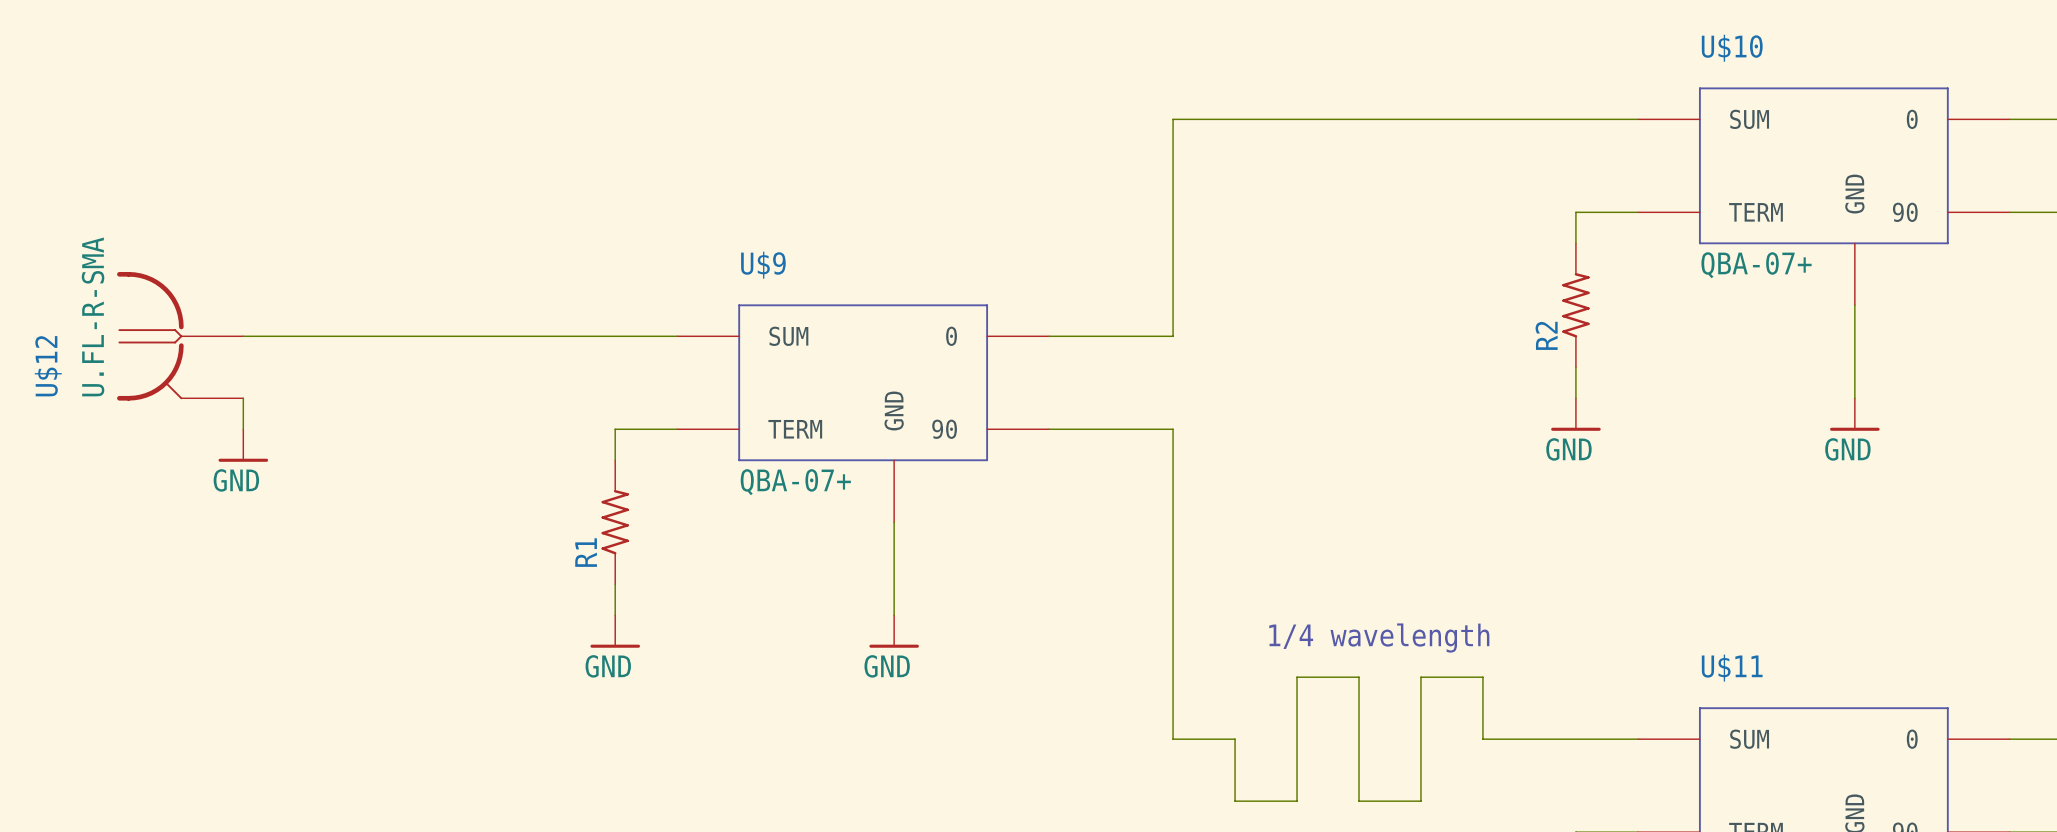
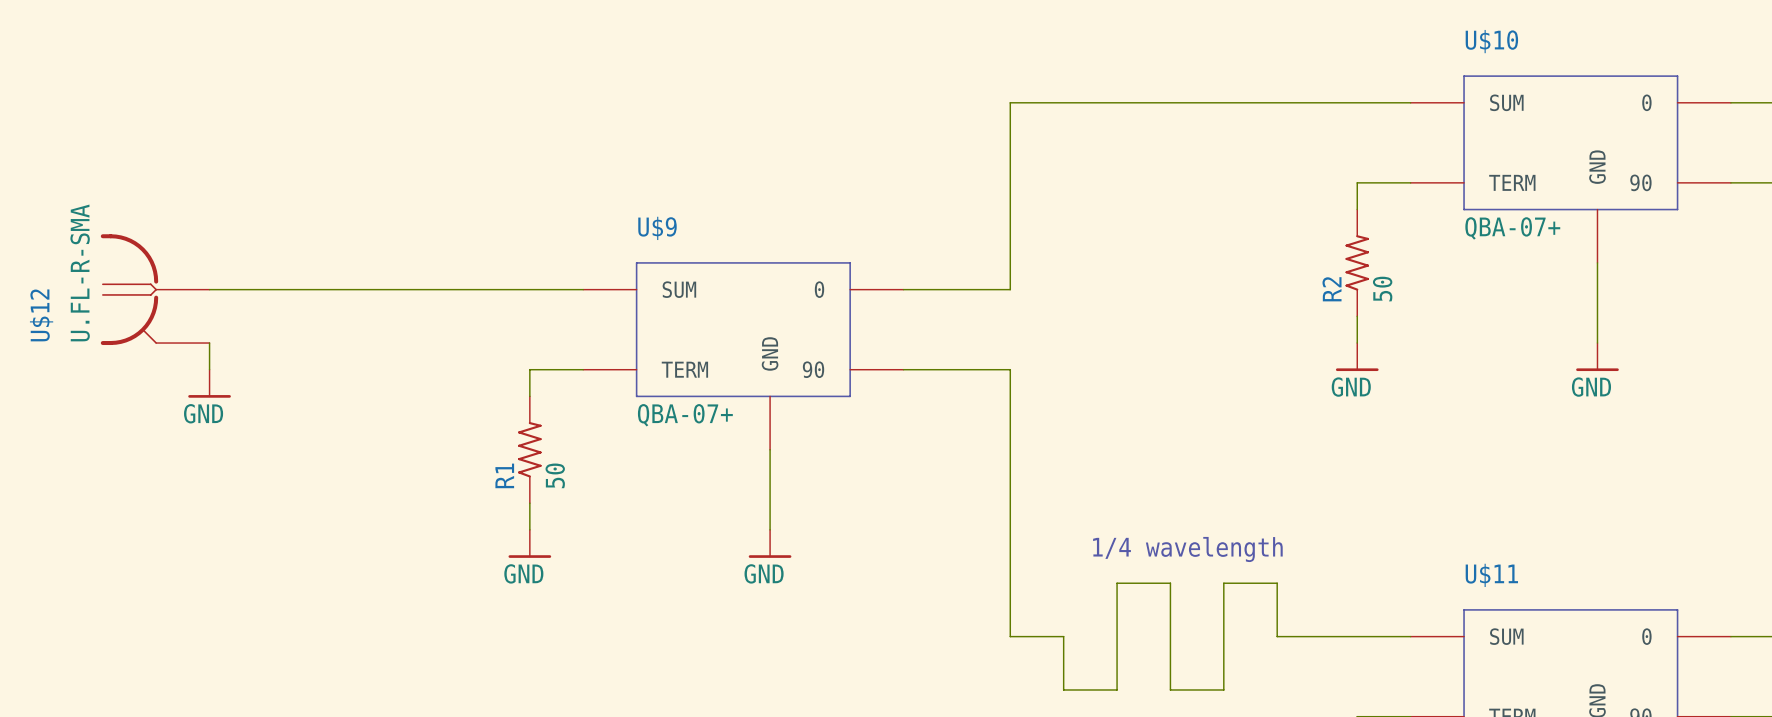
R2 value: none -> 50 (1382, 289)
R1 value: none -> 50 (555, 475)

